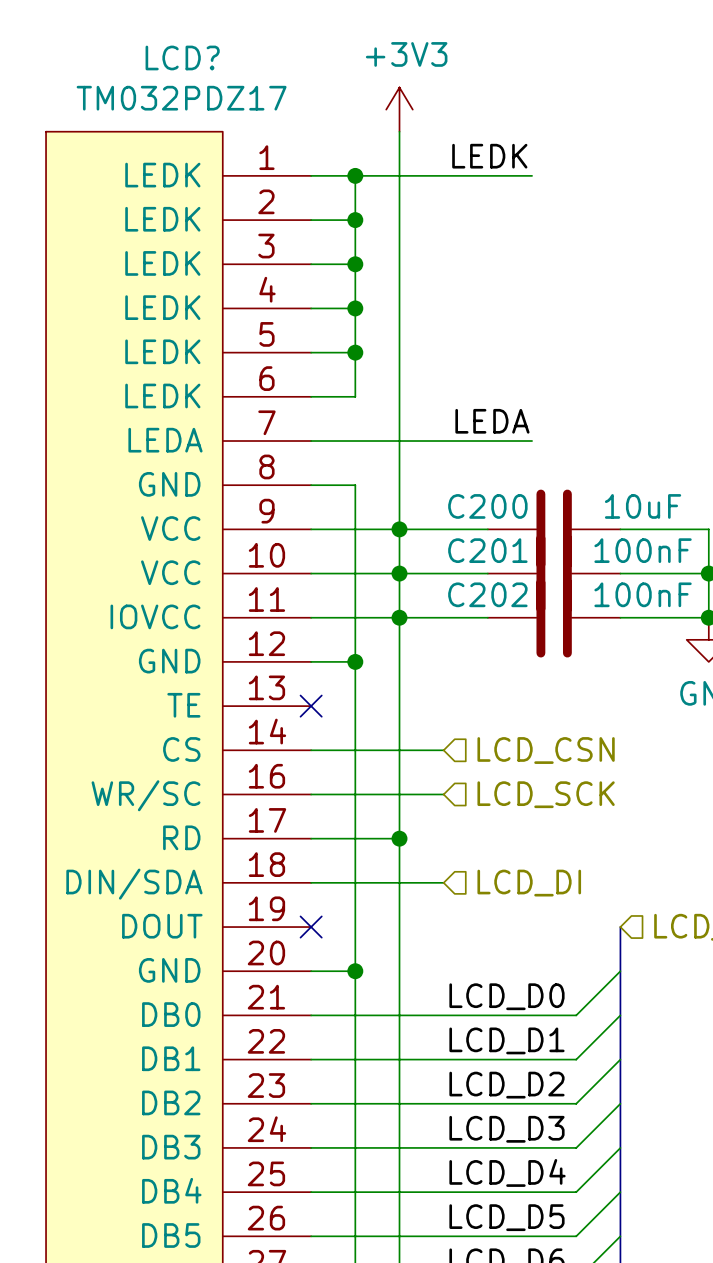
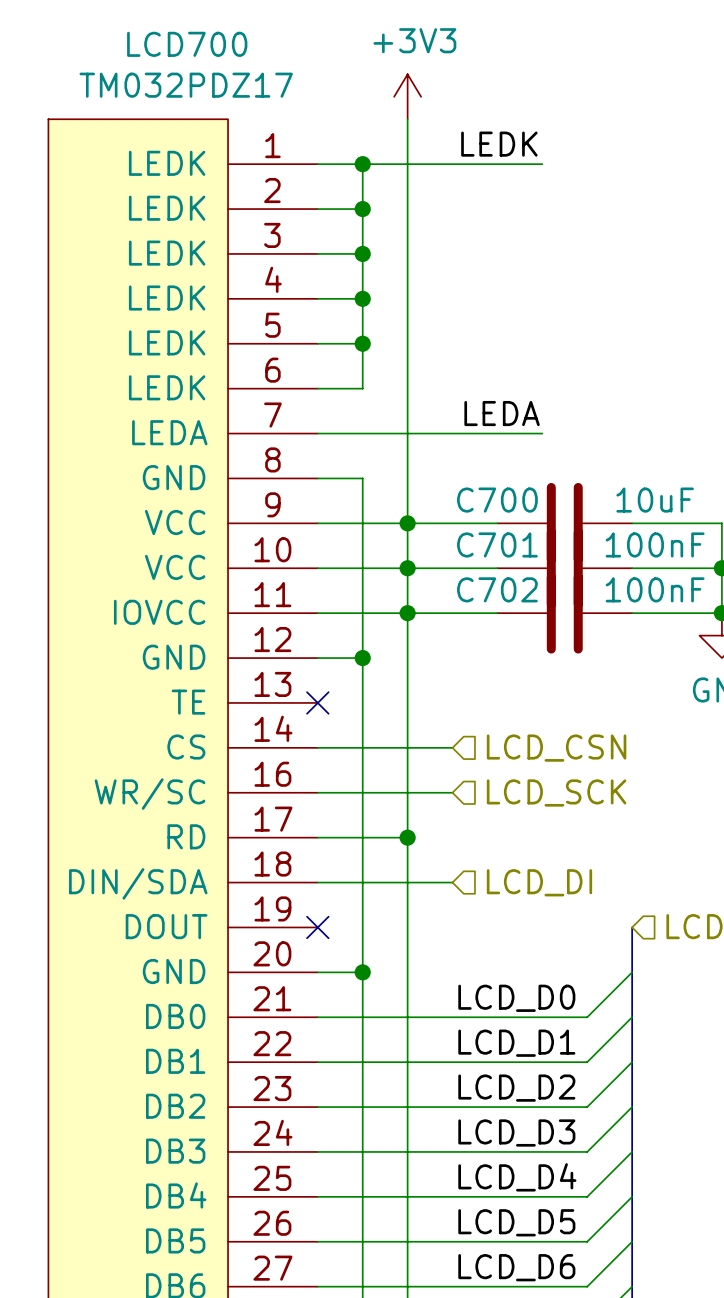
LCD? name: LCD? (182, 57) -> LCD700 (187, 44)
C200 name: C200 (487, 506) -> C700 (497, 500)
C201 name: C201 (487, 550) -> C701 (497, 544)
C202 name: C202 (487, 594) -> C702 (497, 589)

